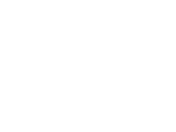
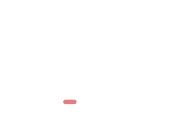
top track: none -> (65, 101) (74, 101)

